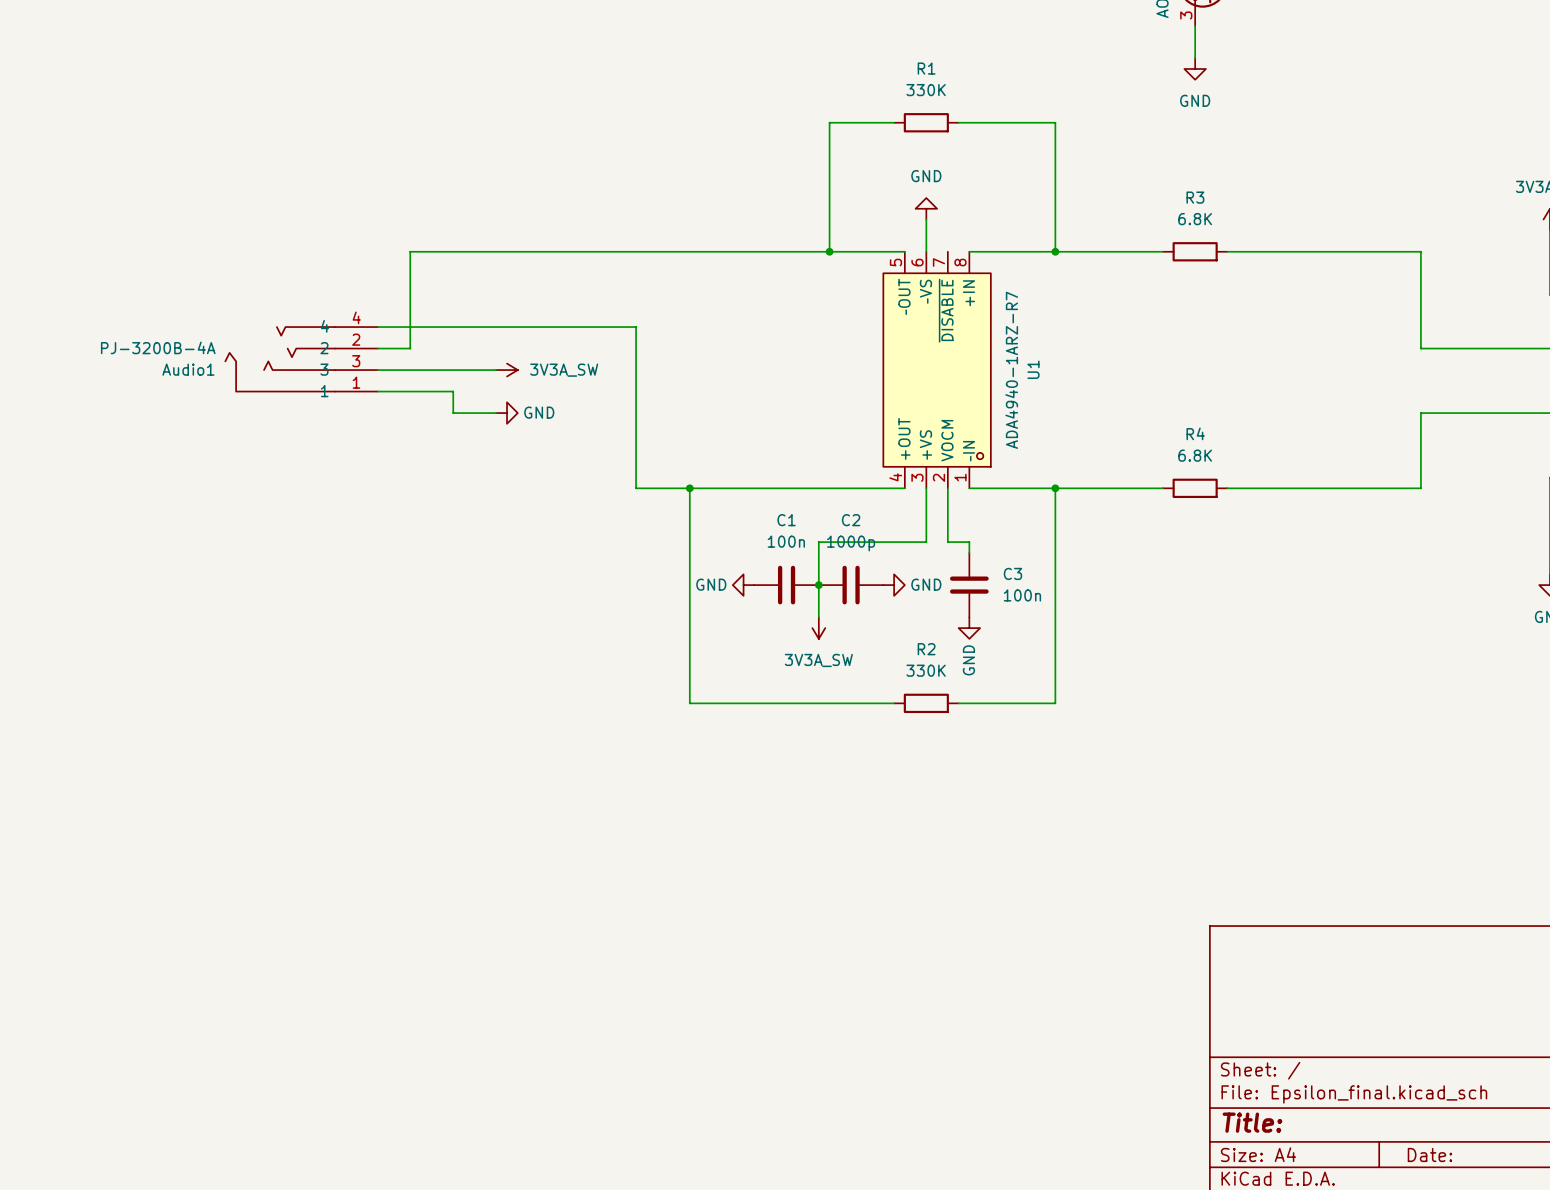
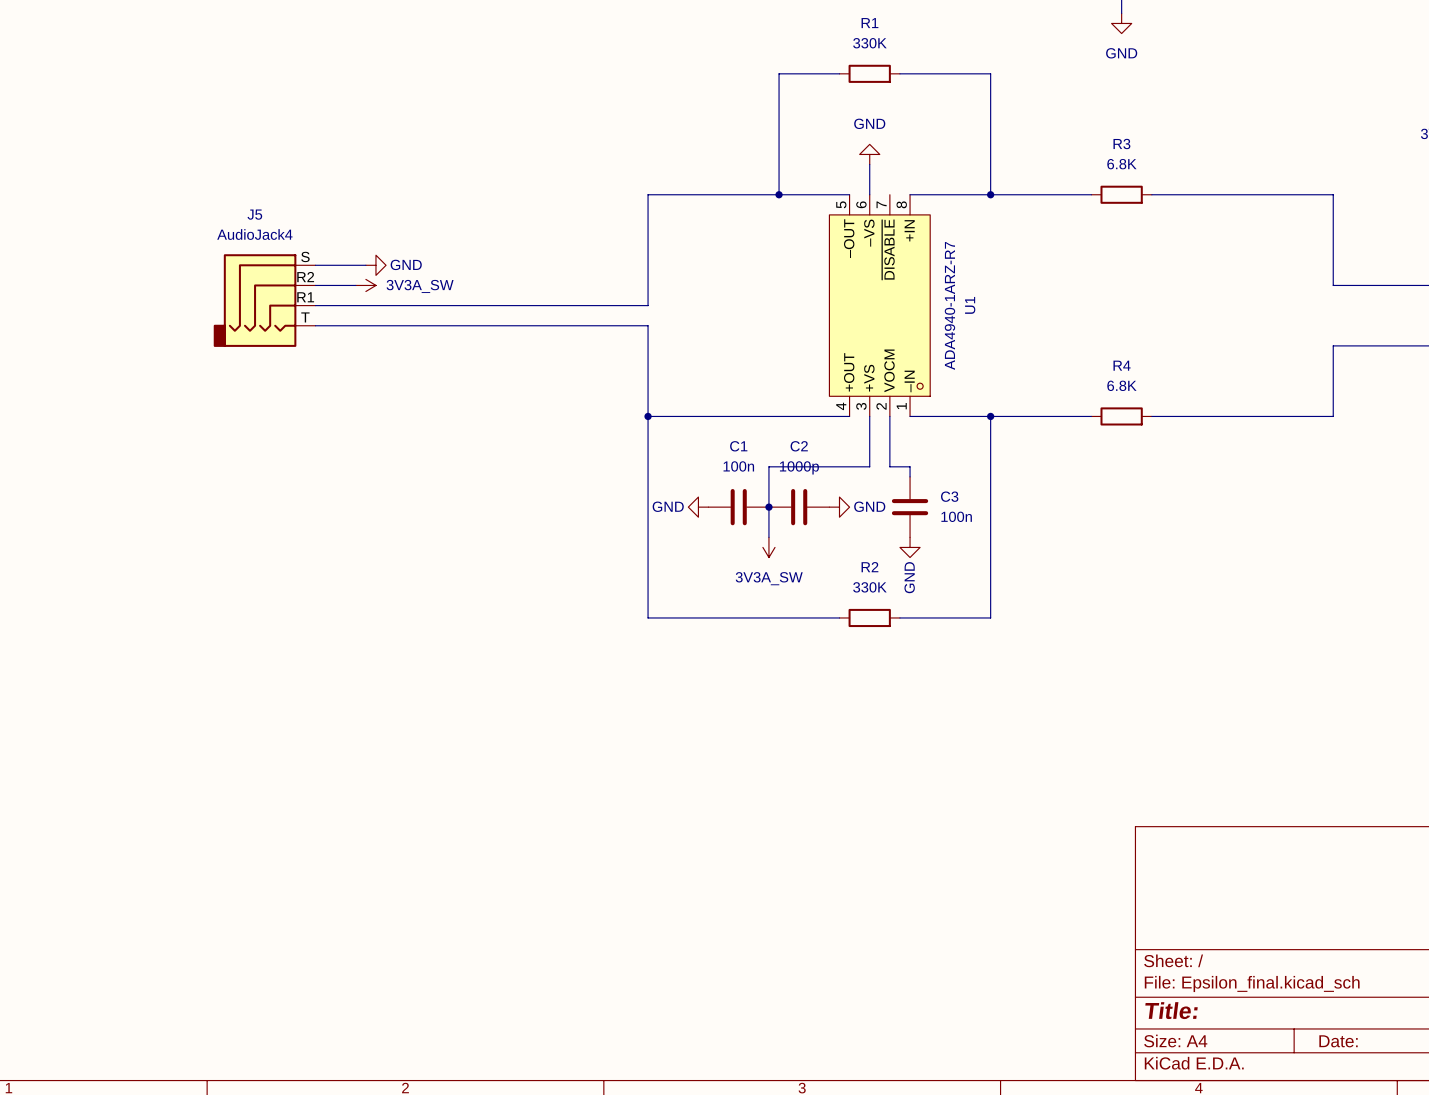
wire: (689, 251) (410, 251) (410, 348) (377, 348) -> (648, 194) (648, 305) (466, 305)
wire: (388, 327) (636, 327) (636, 488) (689, 488) -> (426, 325) (648, 325) (648, 416)
Audio1: PJ-3200B-4A (301, 359) -> none
J5: none -> AudioJack4 (264, 300)
power symbol position: 3V3A_SW (507, 370) -> 3V3A_SW (365, 285)
wire: (453, 391) (453, 413) (496, 413) -> none
power symbol position: GND (507, 413) -> GND (375, 265)

